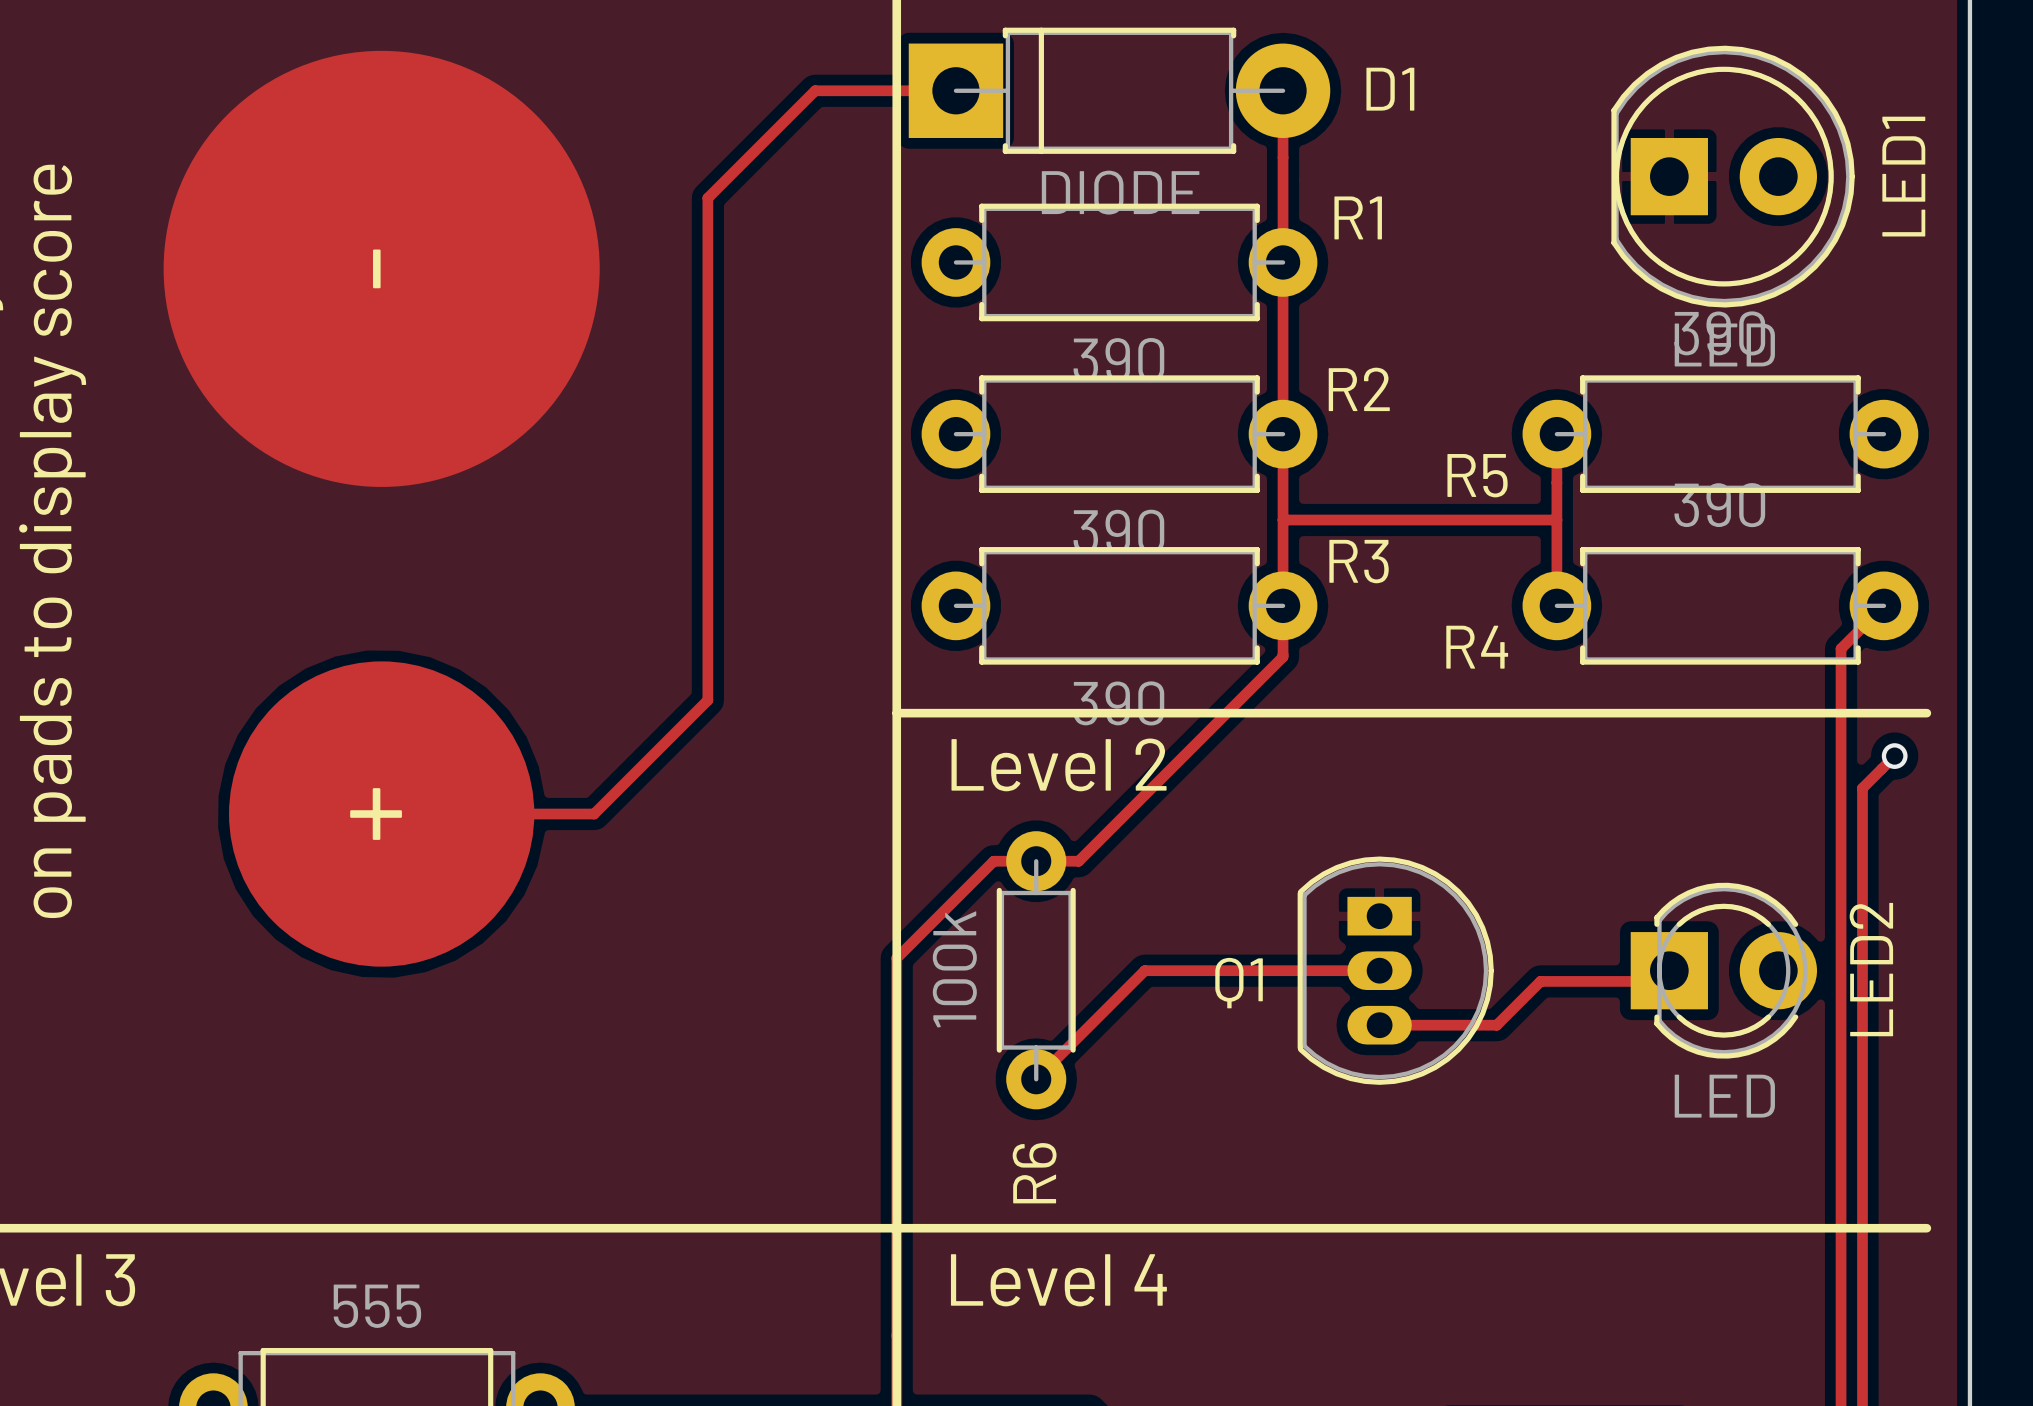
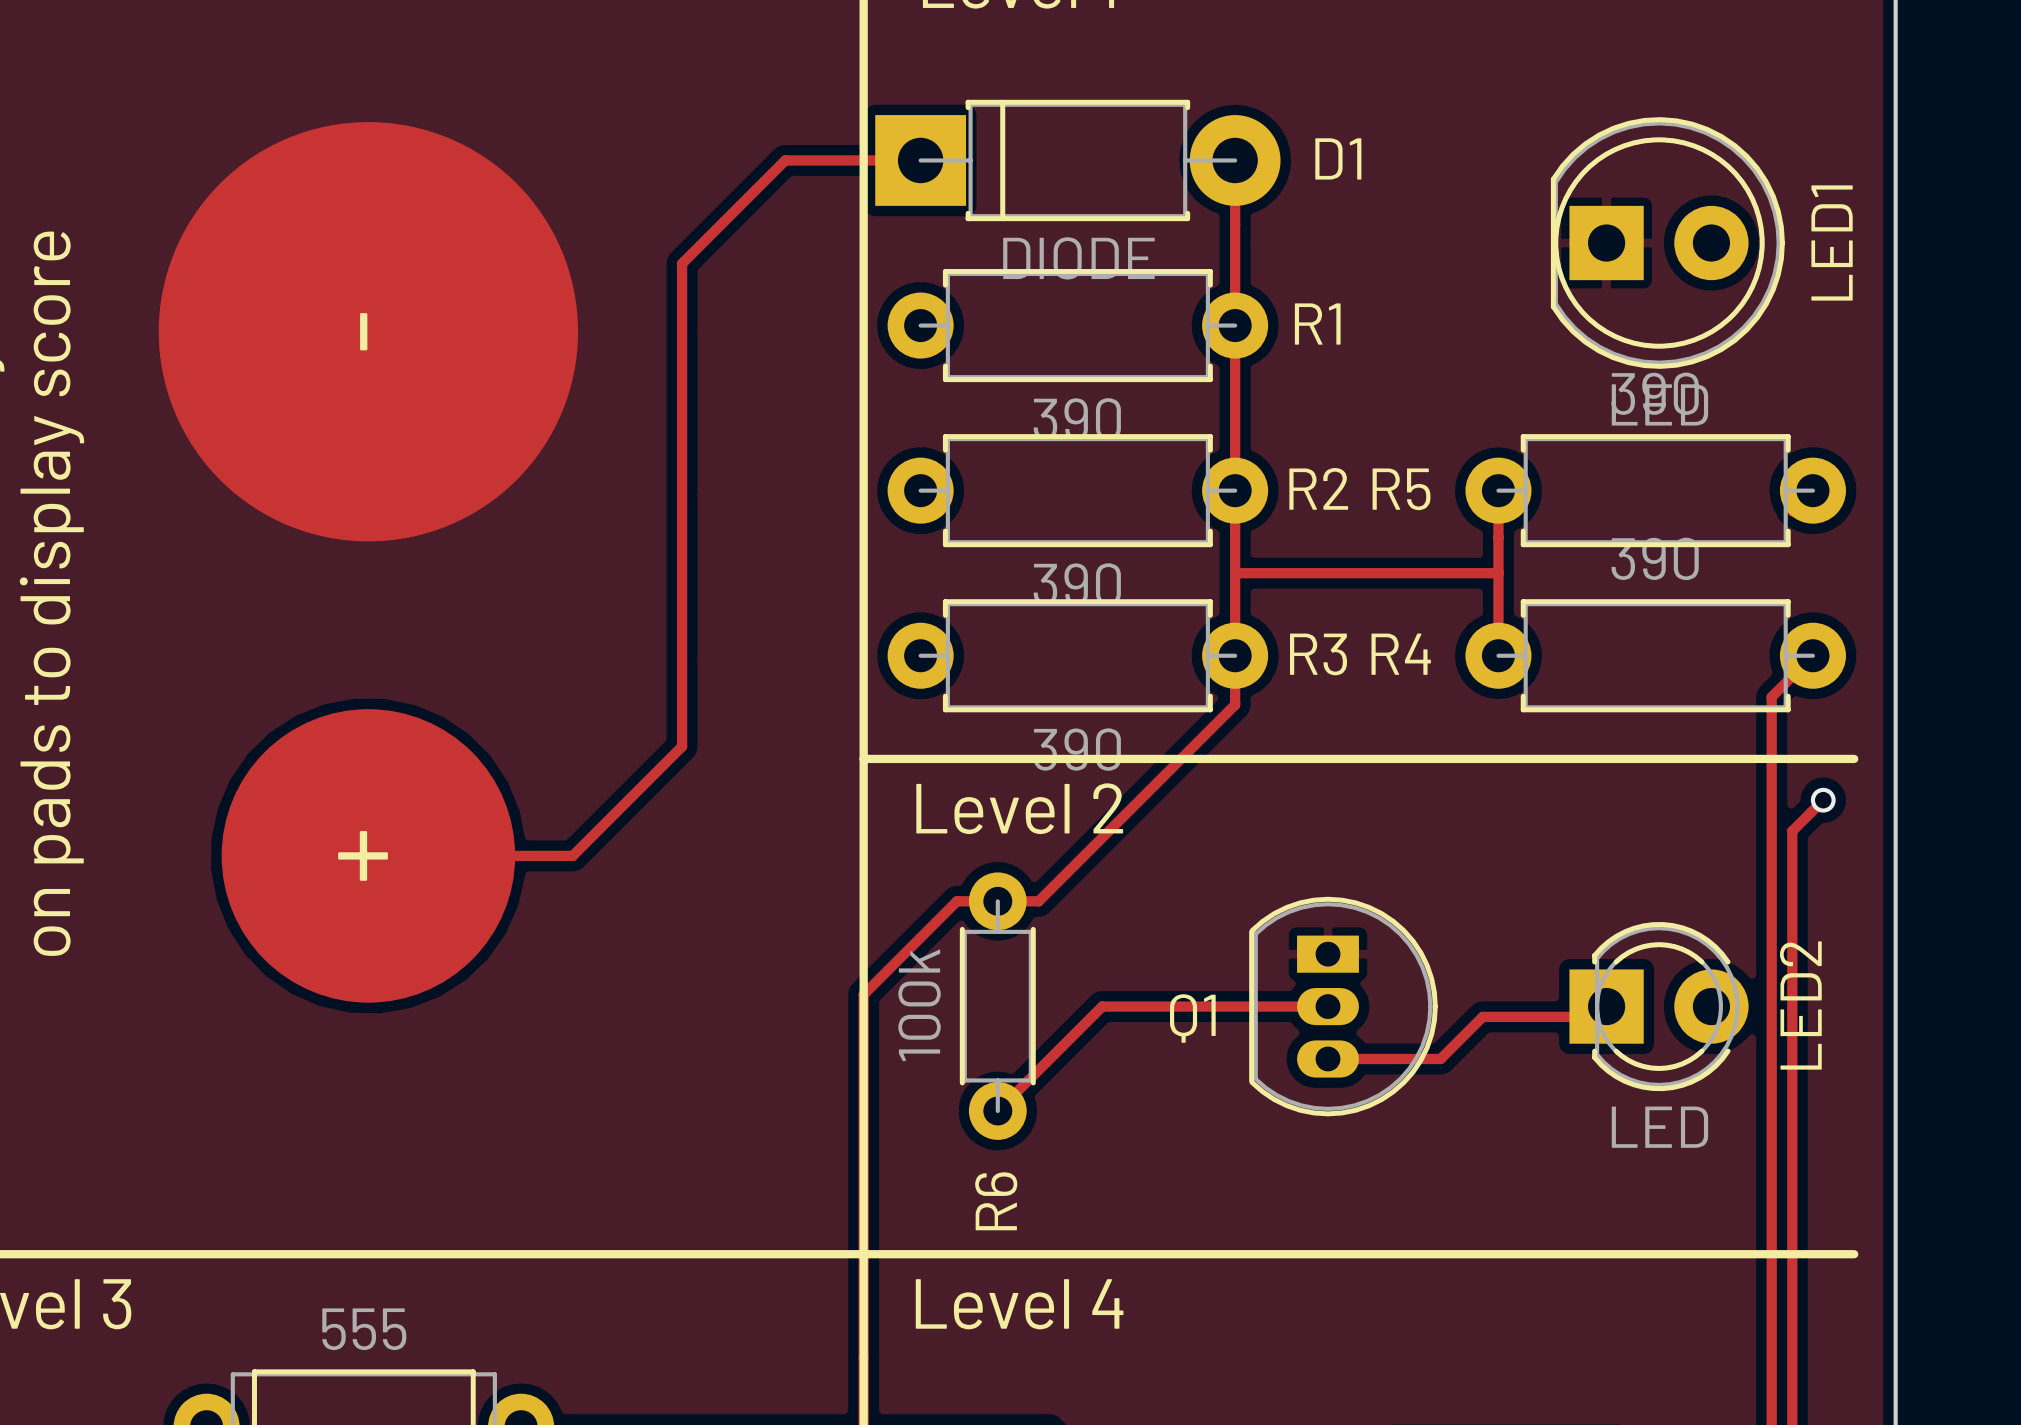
R1 name position: R1 (1358, 217) -> R1 (1317, 324)
R2 name position: R2 (1359, 389) -> R2 (1318, 488)
R5 name position: R5 (1477, 475) -> R5 (1401, 489)
R3 name position: R3 (1359, 561) -> R3 (1318, 654)
R4 name position: R4 (1477, 647) -> R4 (1401, 654)

